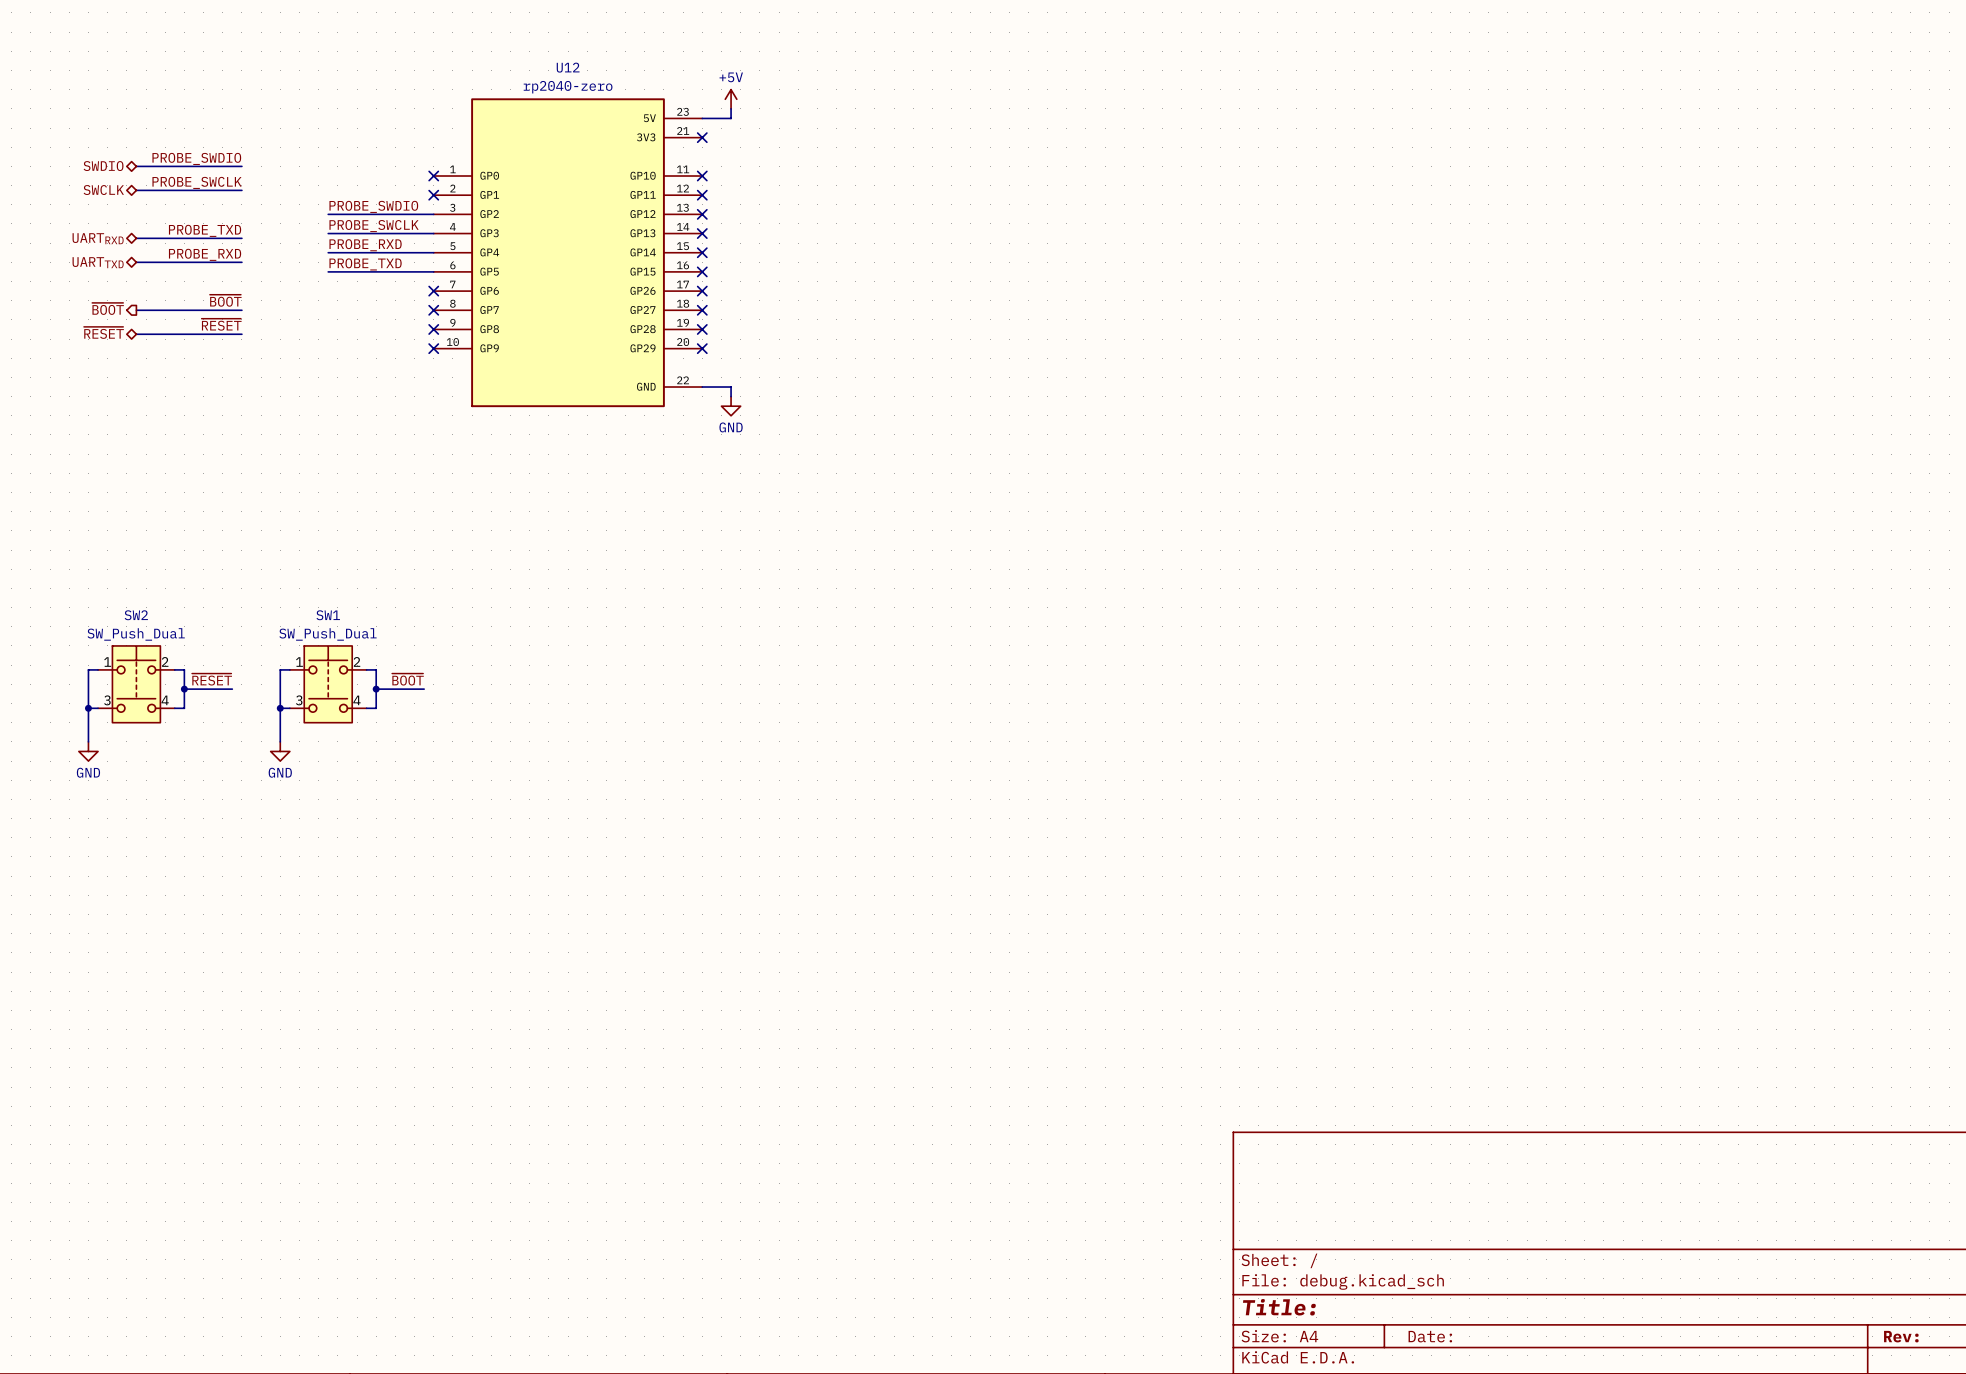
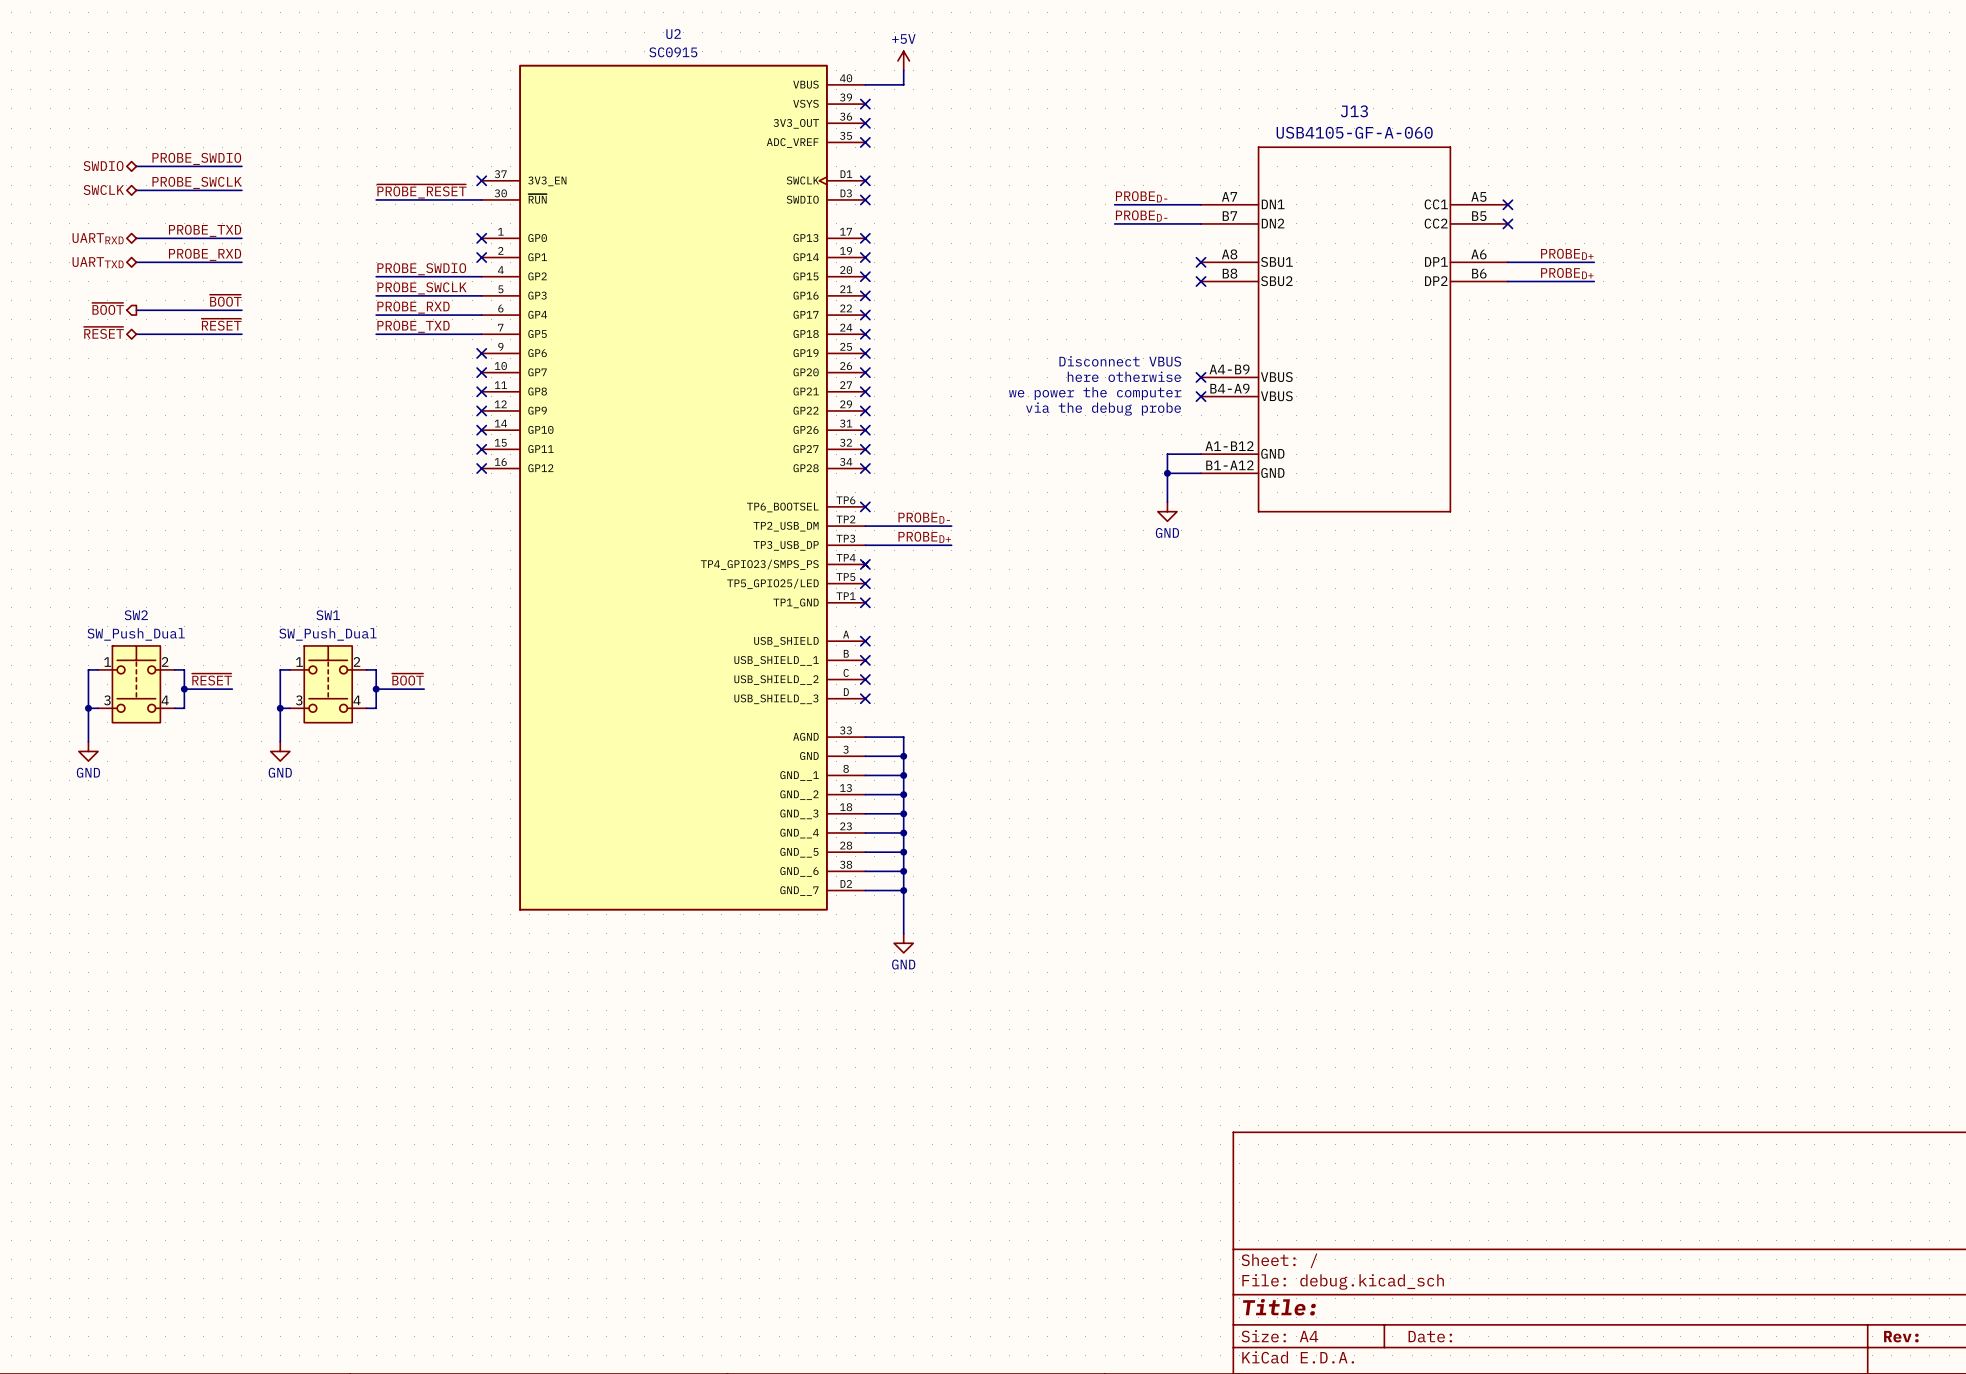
wire: none -> (903, 70) (903, 84) (865, 84)
power symbol position: +5V (731, 99) -> +5V (903, 60)
no-connect mark: none -> (865, 104)
no-connect mark: none -> (865, 123)
no-connect mark: (702, 137) -> none
no-connect mark: none -> (865, 142)
no-connect mark: (433, 176) -> none
no-connect mark: (702, 176) -> none
no-connect mark: none -> (481, 180)
no-connect mark: none -> (865, 180)
label: none -> ~{PROBE_RESET} (421, 191)
no-connect mark: (433, 195) -> none
no-connect mark: (702, 195) -> none
label: none -> PROBED- (1141, 196)
wire: none -> (376, 199) (481, 199)
no-connect mark: none -> (865, 199)
wire: none -> (1114, 204) (1201, 204)
no-connect mark: none -> (1507, 204)
label position: PROBE_SWDIO (373, 206) -> PROBE_SWDIO (421, 269)
wire: (328, 214) (433, 214) -> (376, 276) (481, 276)
no-connect mark: (702, 214) -> none
label: none -> PROBED- (1141, 216)
wire: none -> (1114, 223) (1201, 223)
no-connect mark: none -> (1507, 223)
label position: PROBE_SWCLK (374, 226) -> PROBE_SWCLK (421, 288)
wire: (328, 233) (433, 233) -> (376, 295) (481, 295)
no-connect mark: (702, 233) -> none
no-connect mark: none -> (481, 238)
no-connect mark: none -> (865, 238)
label position: PROBE_RXD (365, 245) -> PROBE_RXD (413, 307)
wire: (328, 252) (433, 252) -> (376, 315) (481, 315)
U12: rp2040-zero (568, 252) -> none
no-connect mark: (702, 252) -> none
label: none -> PROBED+ (1567, 254)
no-connect mark: none -> (481, 257)
no-connect mark: none -> (865, 257)
no-connect mark: none -> (1201, 262)
wire: none -> (1507, 262) (1594, 262)
label position: PROBE_TXD (365, 264) -> PROBE_TXD (413, 326)
wire: (328, 271) (433, 271) -> (376, 334) (481, 334)
no-connect mark: (702, 271) -> none
label: none -> PROBED+ (1567, 273)
no-connect mark: none -> (865, 276)
no-connect mark: none -> (1201, 281)
wire: none -> (1507, 281) (1594, 281)
no-connect mark: (433, 291) -> none
no-connect mark: (702, 291) -> none
no-connect mark: none -> (865, 295)
no-connect mark: (433, 310) -> none
no-connect mark: (702, 310) -> none
no-connect mark: none -> (865, 315)
no-connect mark: (433, 329) -> none
no-connect mark: (702, 329) -> none
J13: none -> USB4105-GF-A-060 (1354, 329)
no-connect mark: none -> (865, 334)
no-connect mark: (433, 348) -> none
no-connect mark: (702, 348) -> none
no-connect mark: none -> (481, 353)
no-connect mark: none -> (865, 353)
text: none -> Disconnect VBUS (1120, 361)
no-connect mark: none -> (481, 372)
no-connect mark: none -> (865, 372)
text: none -> here otherwise (1124, 376)
no-connect mark: none -> (1201, 377)
no-connect mark: none -> (481, 391)
no-connect mark: none -> (865, 391)
text: none -> we power the computer (1095, 393)
no-connect mark: none -> (1201, 396)
power symbol: GND (731, 406) -> none
text: none -> via the debug probe (1103, 409)
no-connect mark: none -> (481, 410)
no-connect mark: none -> (865, 410)
no-connect mark: none -> (481, 430)
no-connect mark: none -> (865, 430)
no-connect mark: none -> (481, 449)
no-connect mark: none -> (865, 449)
wire: none -> (1201, 454) (1167, 454) (1167, 502)
no-connect mark: none -> (481, 468)
no-connect mark: none -> (865, 468)
wire: none -> (1167, 473) (1201, 473)
junction: none -> (1167, 473)
U2: none -> SC0915 (674, 487)
no-connect mark: none -> (865, 506)
power symbol: none -> GND (1167, 511)
label: none -> PROBED- (924, 518)
wire: none -> (865, 526) (951, 526)
label: none -> PROBED+ (924, 537)
wire: none -> (865, 545) (951, 545)
no-connect mark: none -> (865, 564)
no-connect mark: none -> (865, 583)
no-connect mark: none -> (865, 602)
no-connect mark: none -> (865, 641)
no-connect mark: none -> (865, 660)
no-connect mark: none -> (865, 679)
no-connect mark: none -> (865, 698)
wire: none -> (865, 737) (903, 737) (903, 933)
wire: none -> (865, 756) (903, 756)
junction: none -> (903, 756)
wire: none -> (865, 775) (903, 775)
junction: none -> (903, 775)
wire: none -> (865, 794) (903, 794)
junction: none -> (903, 794)
wire: none -> (865, 813) (903, 813)
junction: none -> (903, 813)
wire: none -> (865, 832) (903, 832)
junction: none -> (903, 832)
wire: none -> (865, 852) (903, 852)
junction: none -> (903, 852)
wire: none -> (865, 871) (903, 871)
junction: none -> (903, 871)
wire: none -> (865, 890) (903, 890)
junction: none -> (903, 890)
power symbol: none -> GND (903, 943)

